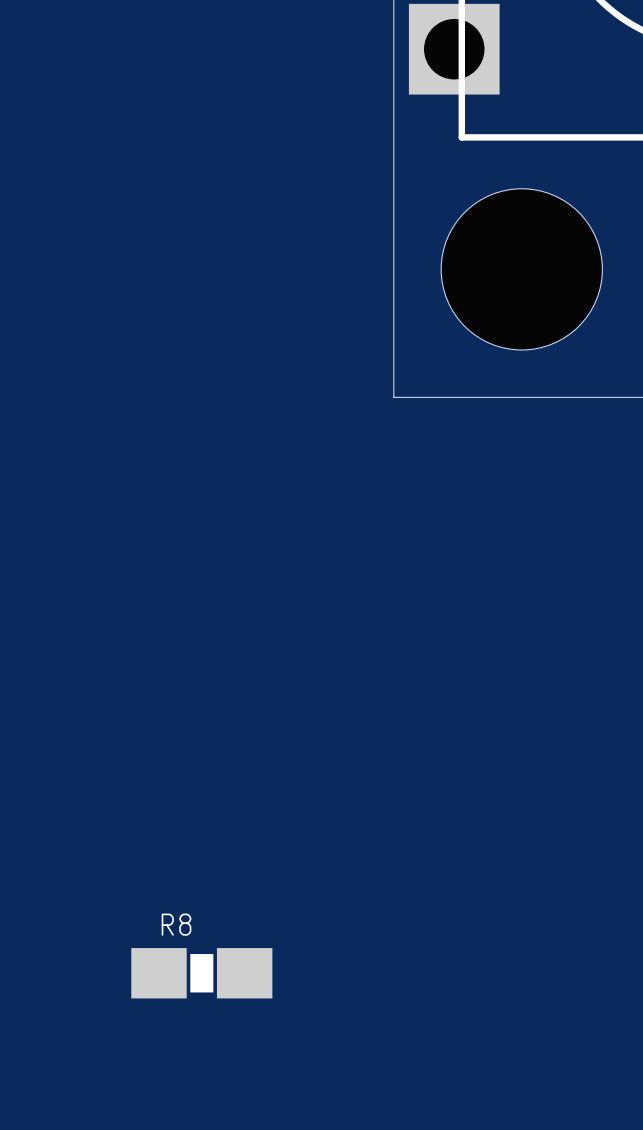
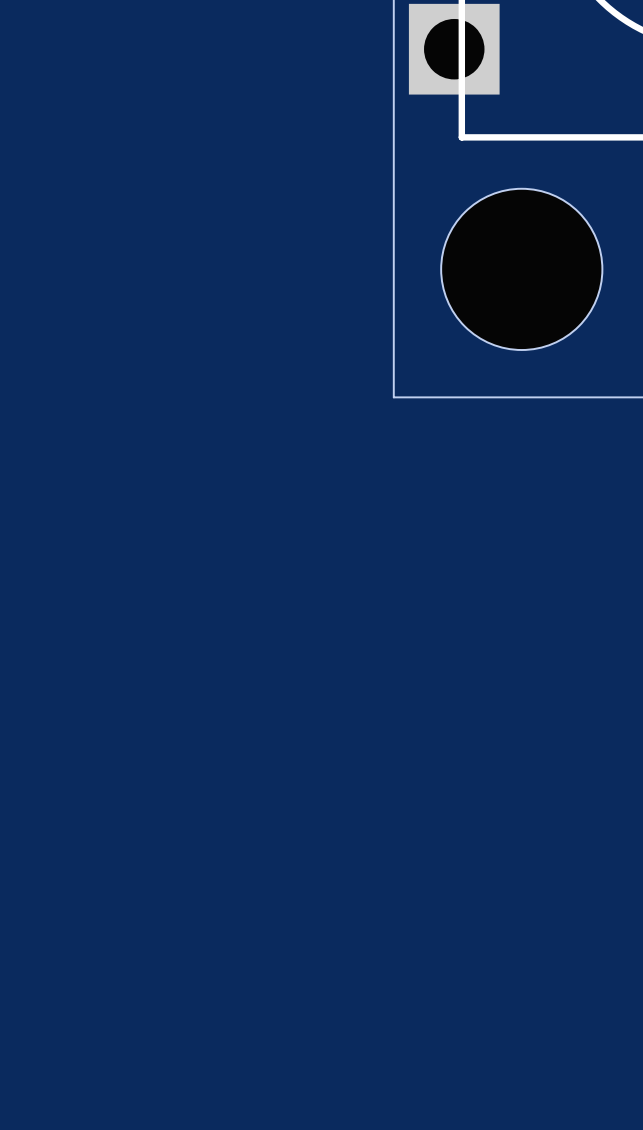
R8: (201, 973) -> none

